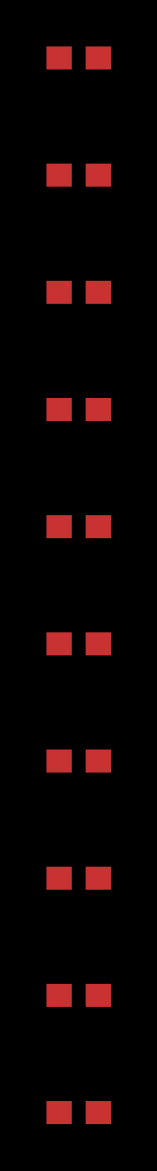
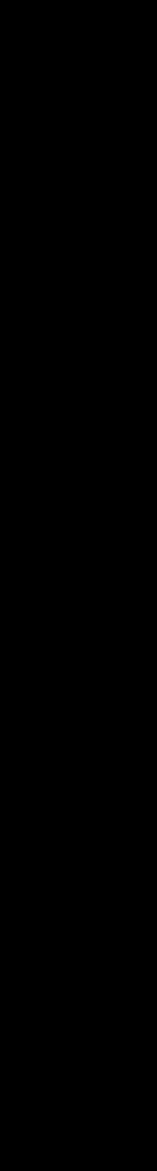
part: (78, 57) -> none
part: (78, 175) -> none
part: (78, 292) -> none
part: (78, 409) -> none
part: (78, 526) -> none
part: (78, 643) -> none
part: (78, 761) -> none
part: (78, 878) -> none
part: (78, 995) -> none
part: (78, 1112) -> none

